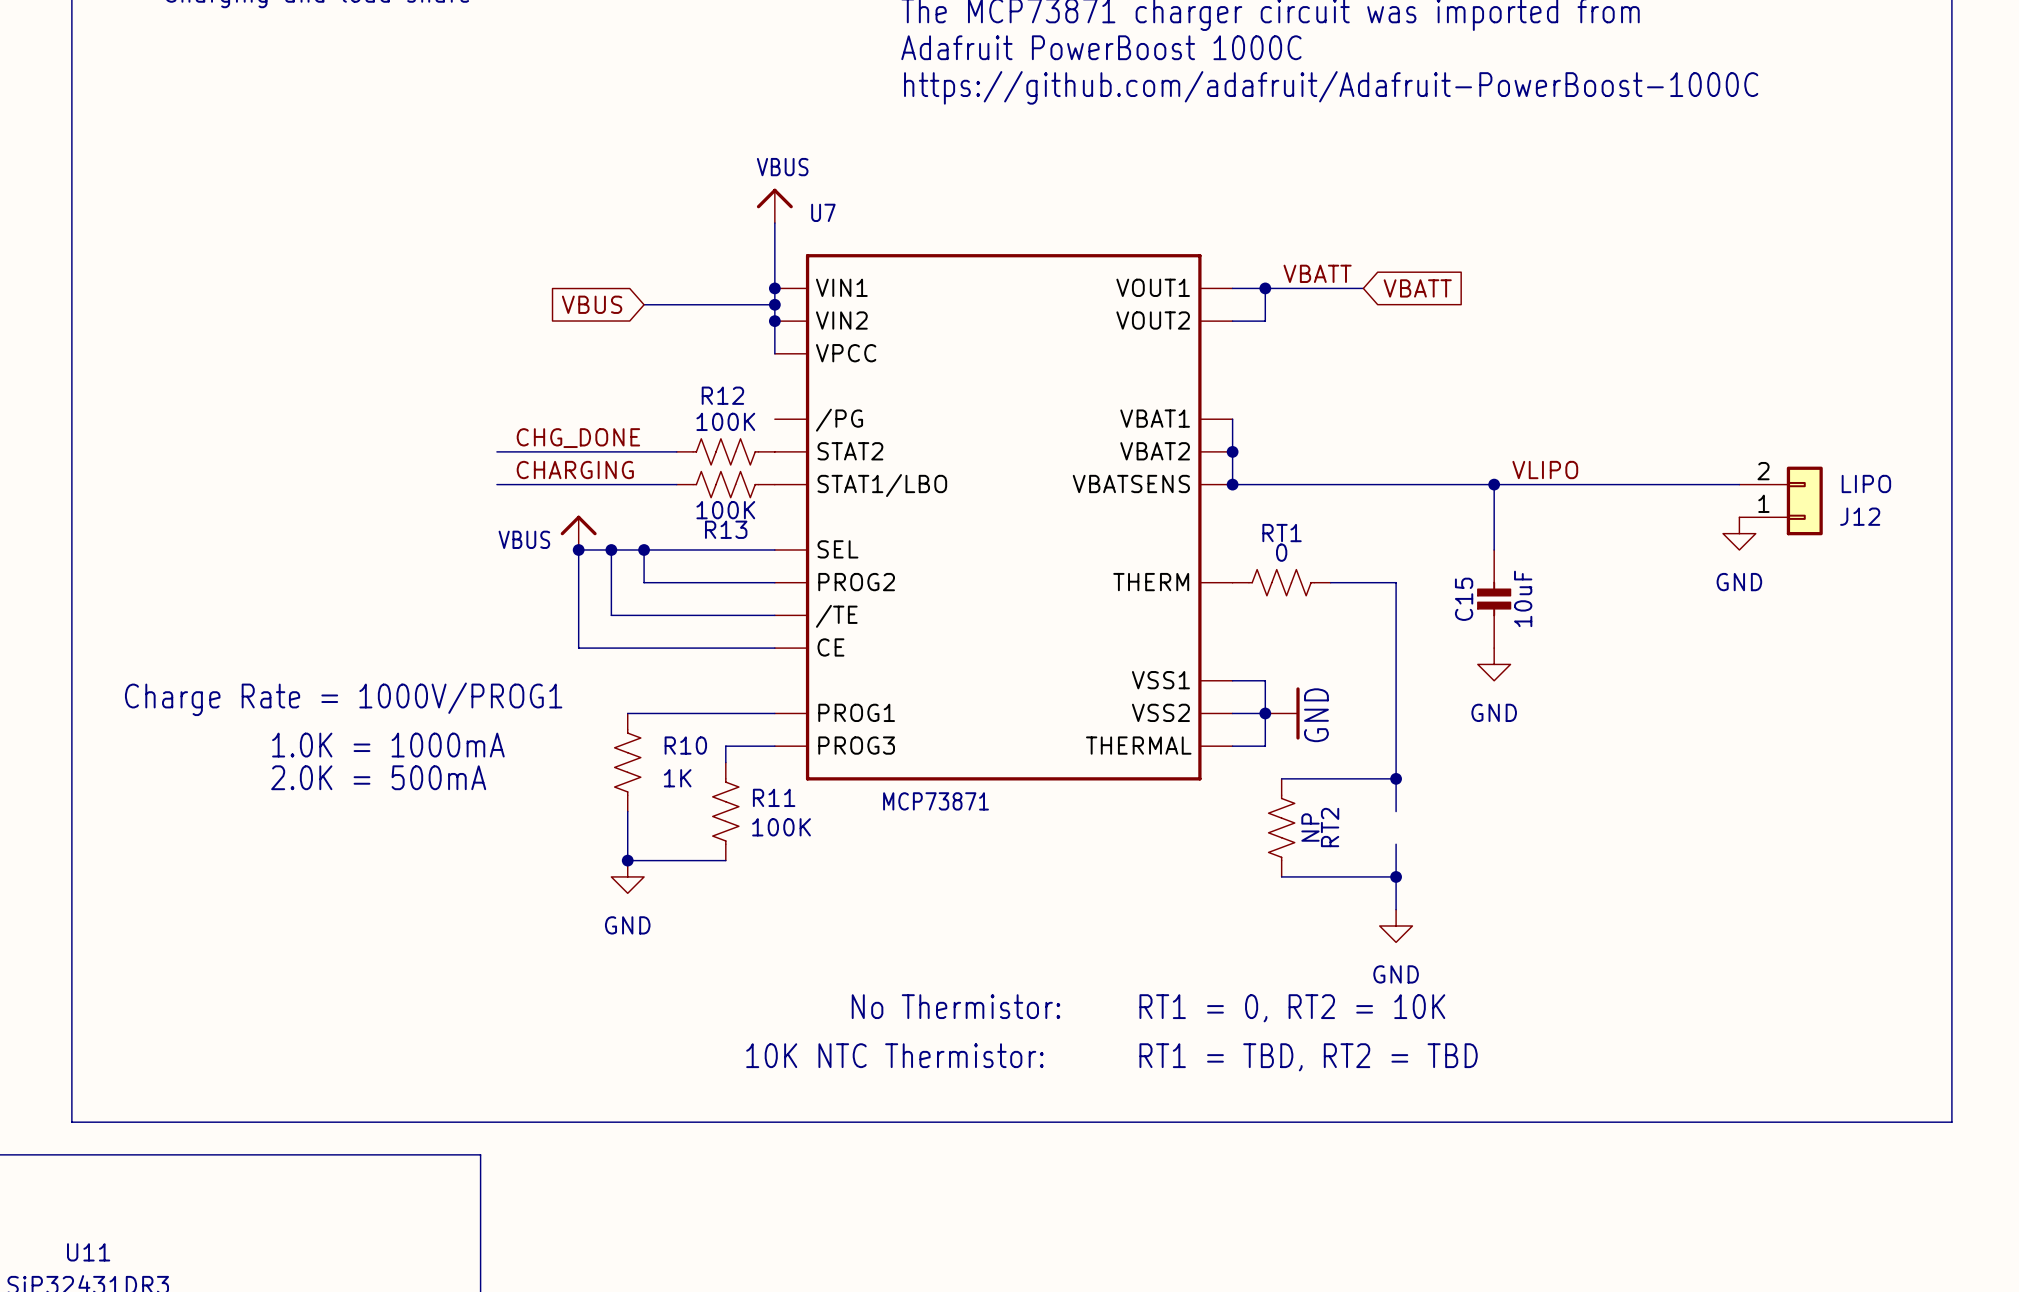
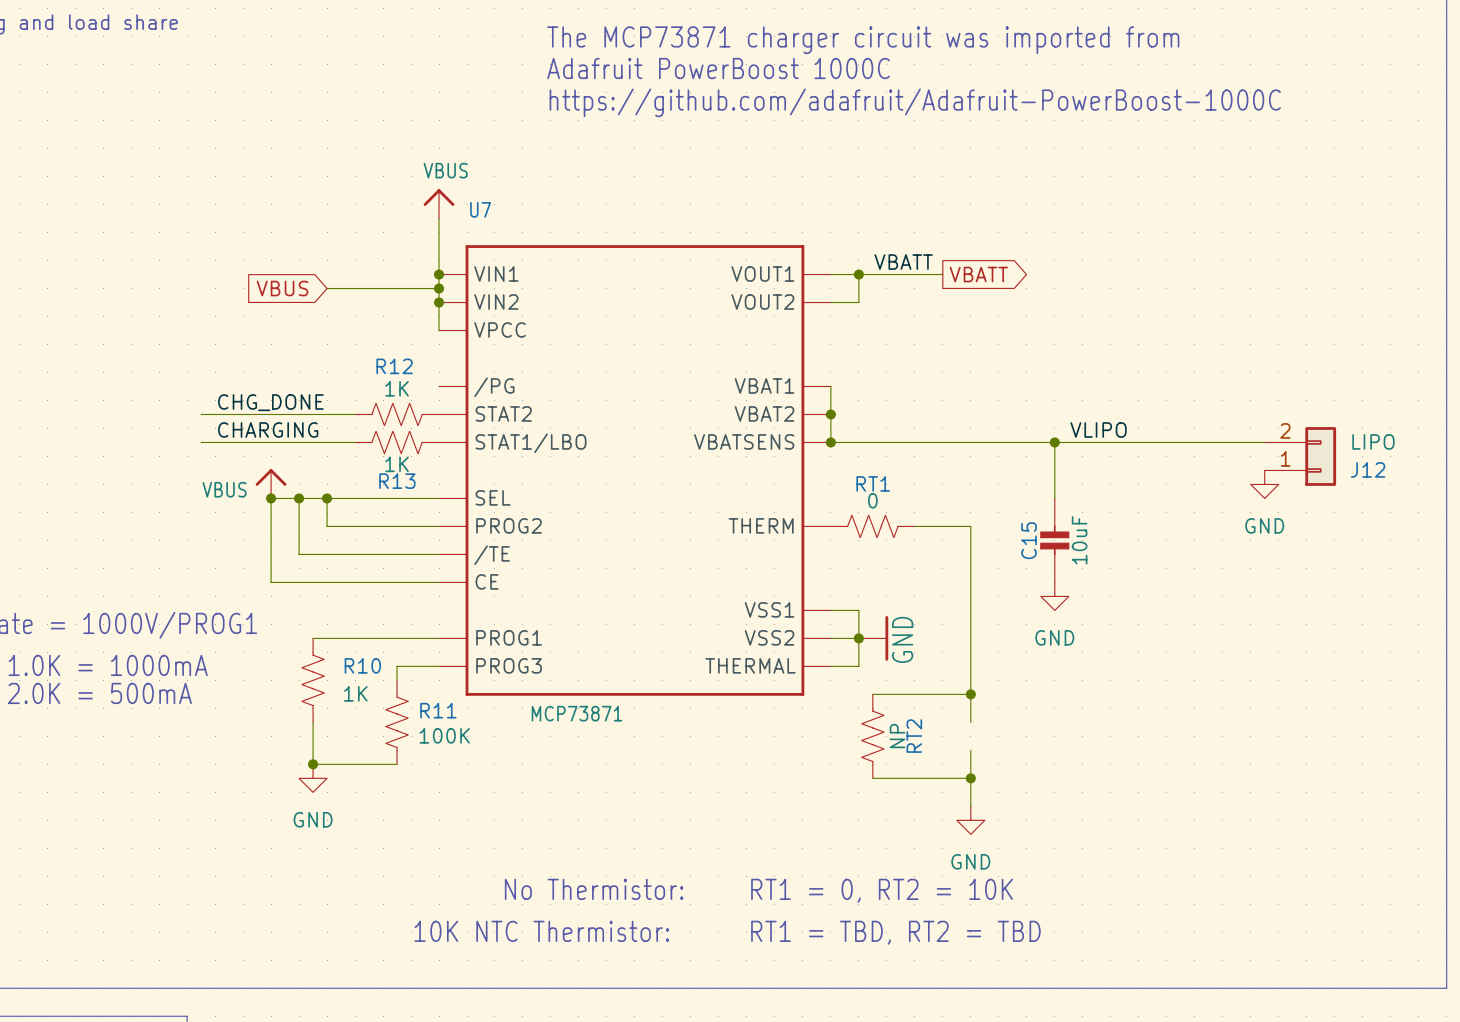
global label shape: input (1417, 288) -> output (978, 274)
R12 value: 100K (725, 421) -> 1K (397, 388)
R13 value: 100K (725, 510) -> 1K (397, 464)

